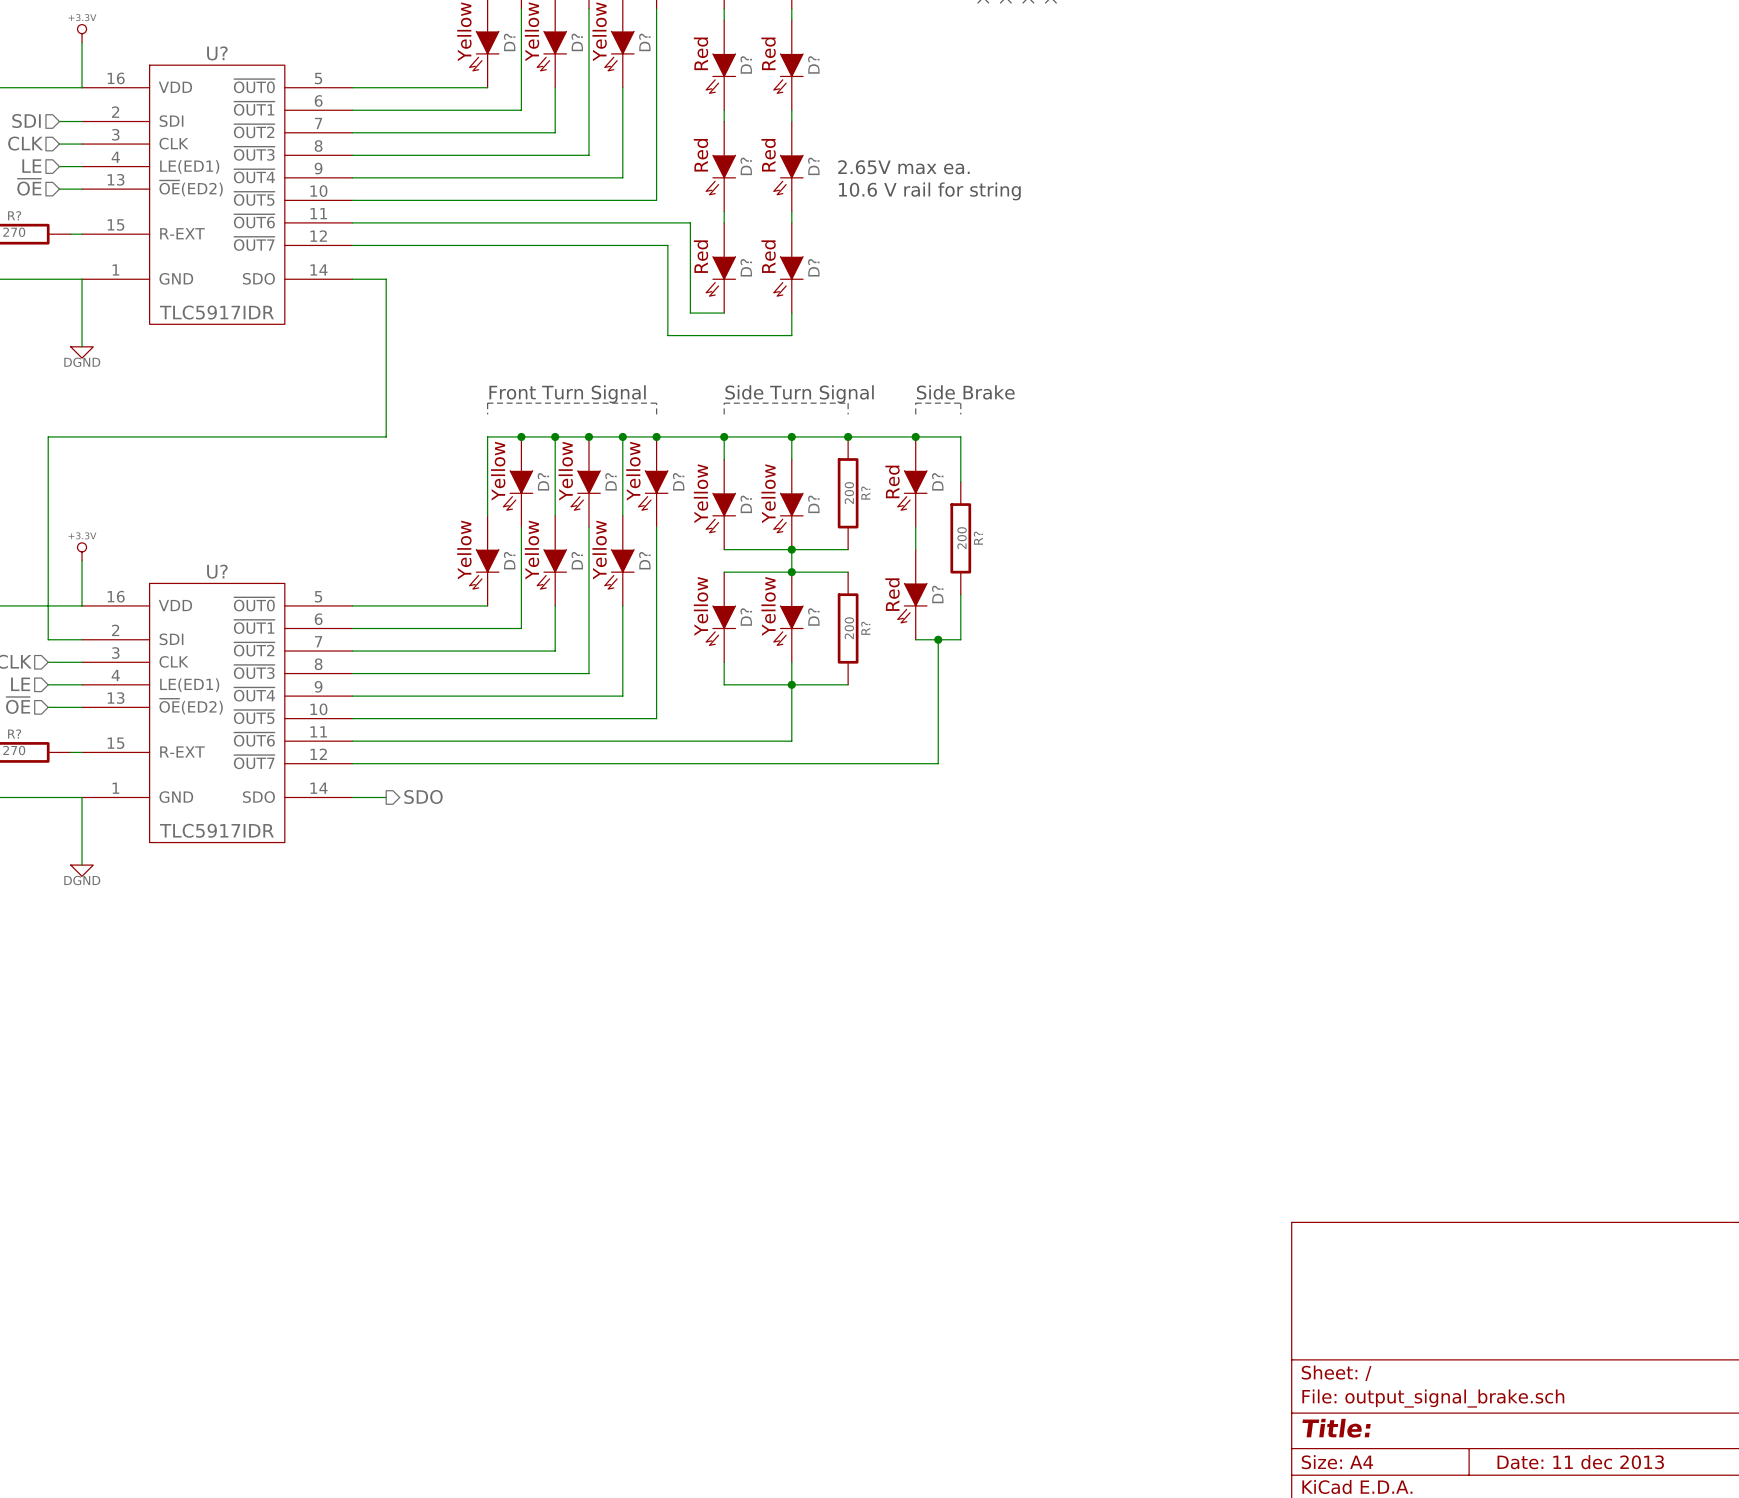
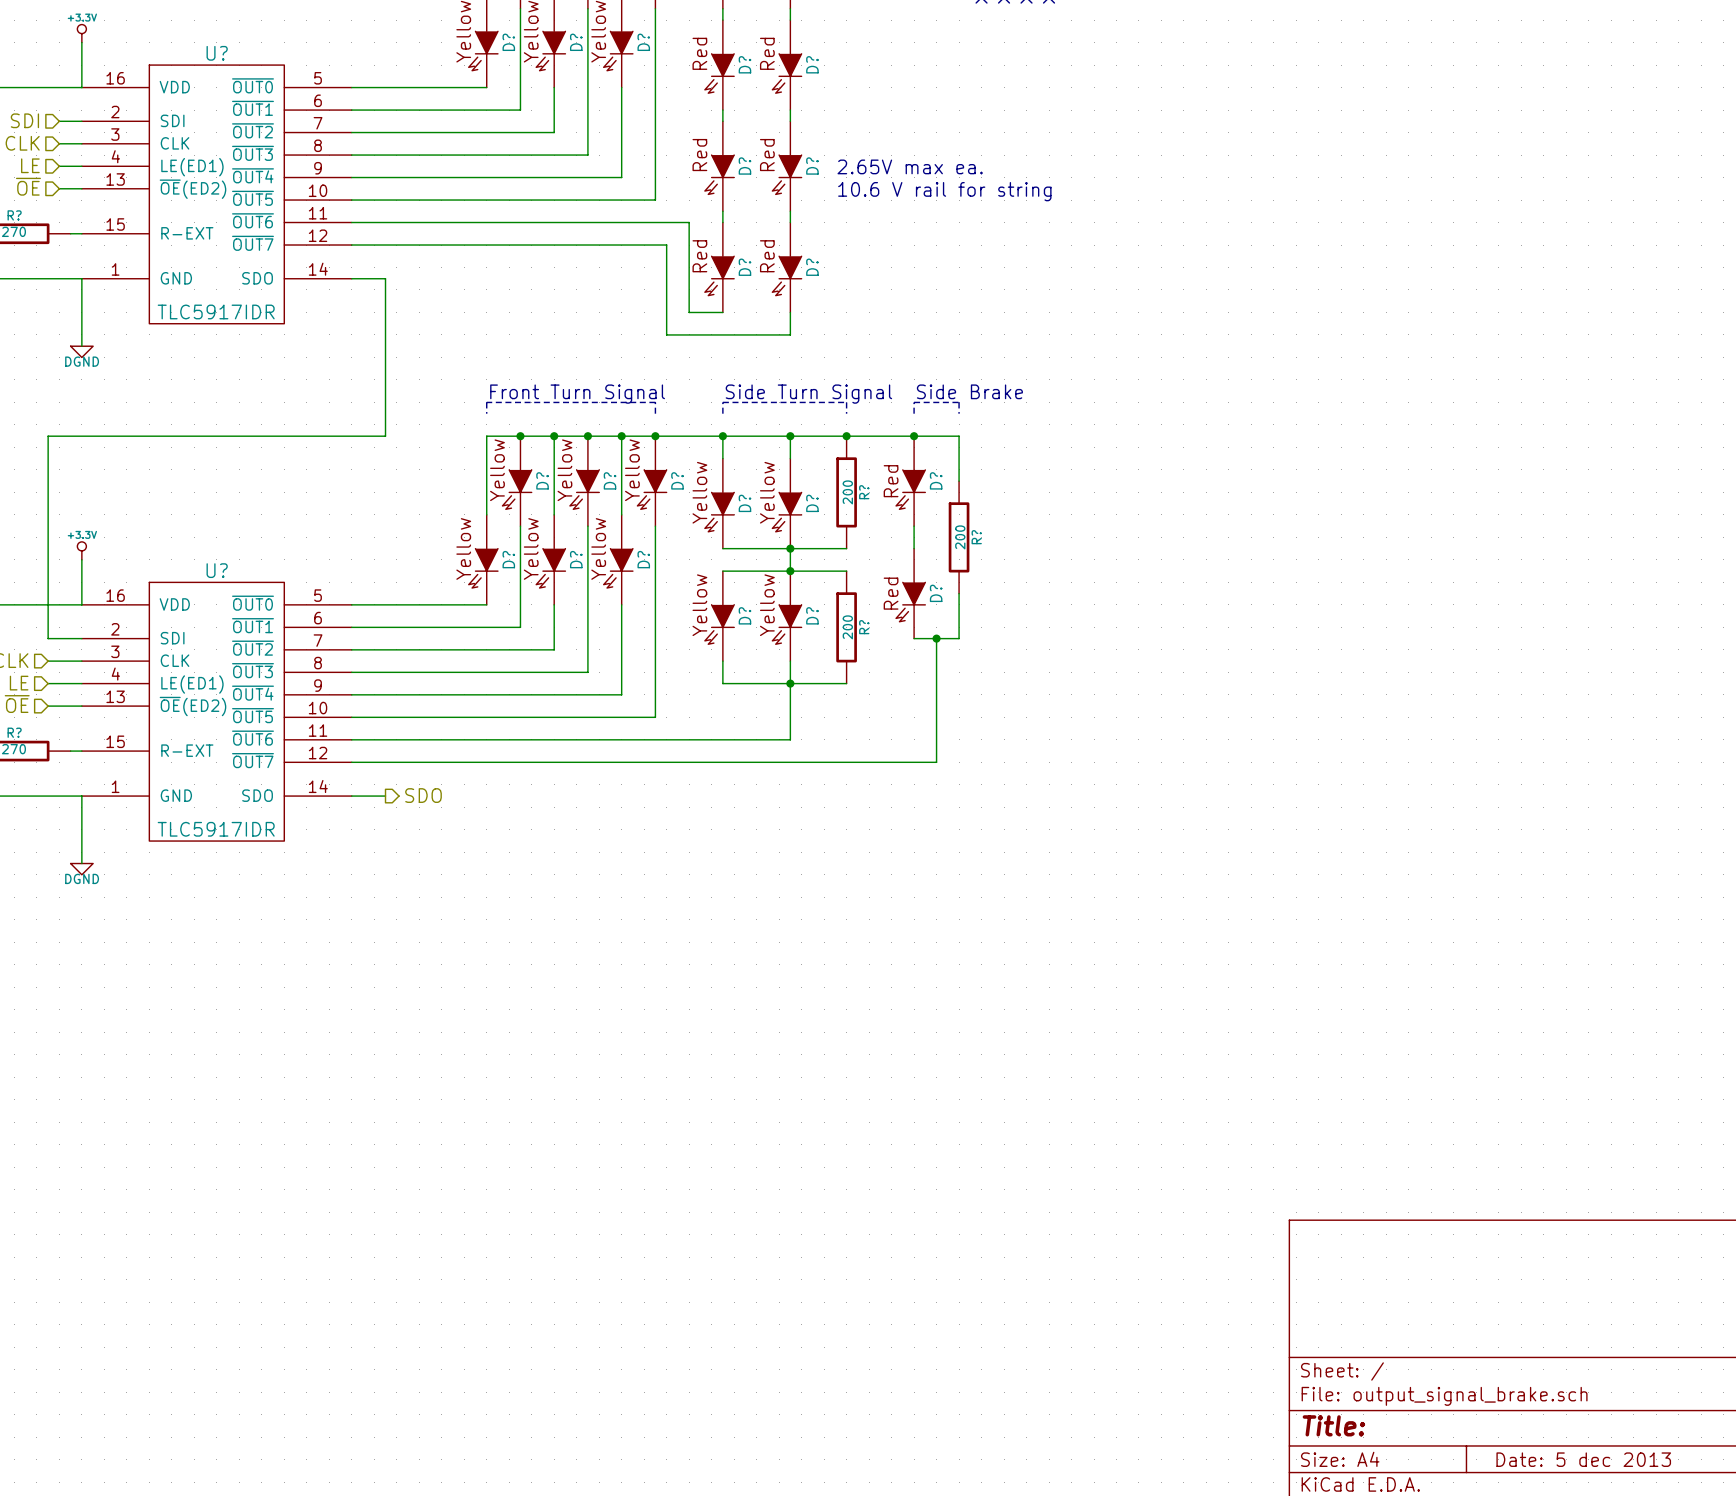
title block: Date: 11 dec 2013 (1580, 1462) -> Date: 5 dec 2013 (1583, 1459)

